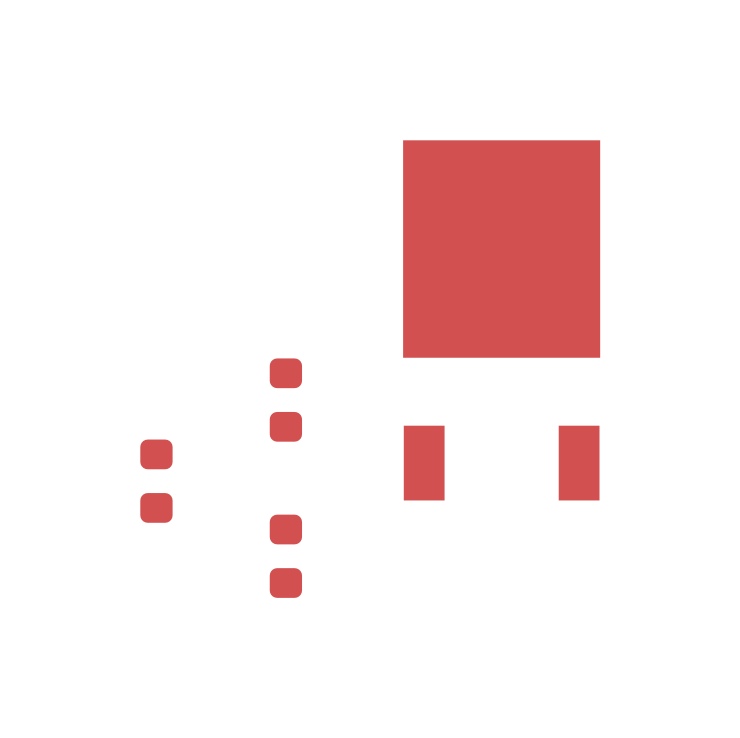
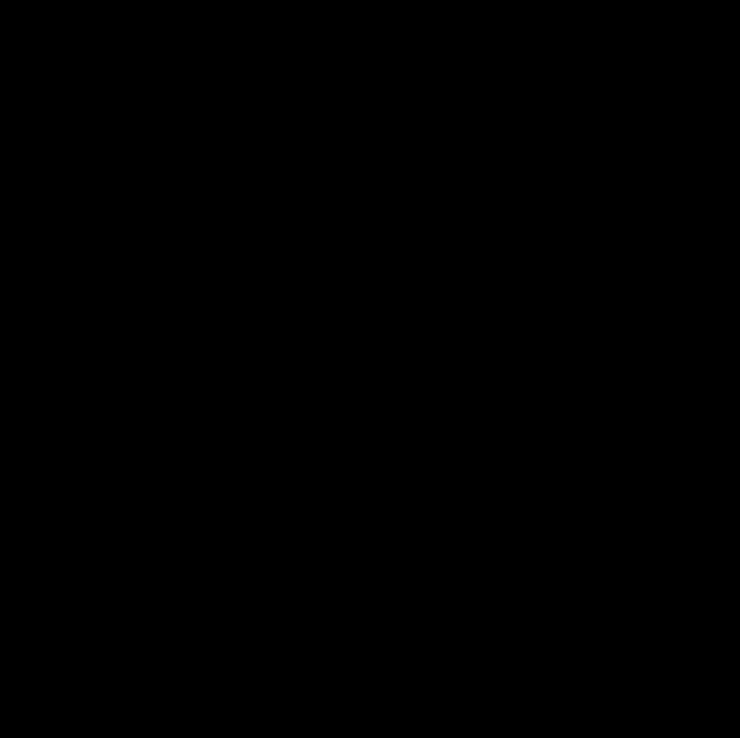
part: (501, 320) -> none
part: (285, 400) -> none
part: (156, 481) -> none
part: (285, 556) -> none

